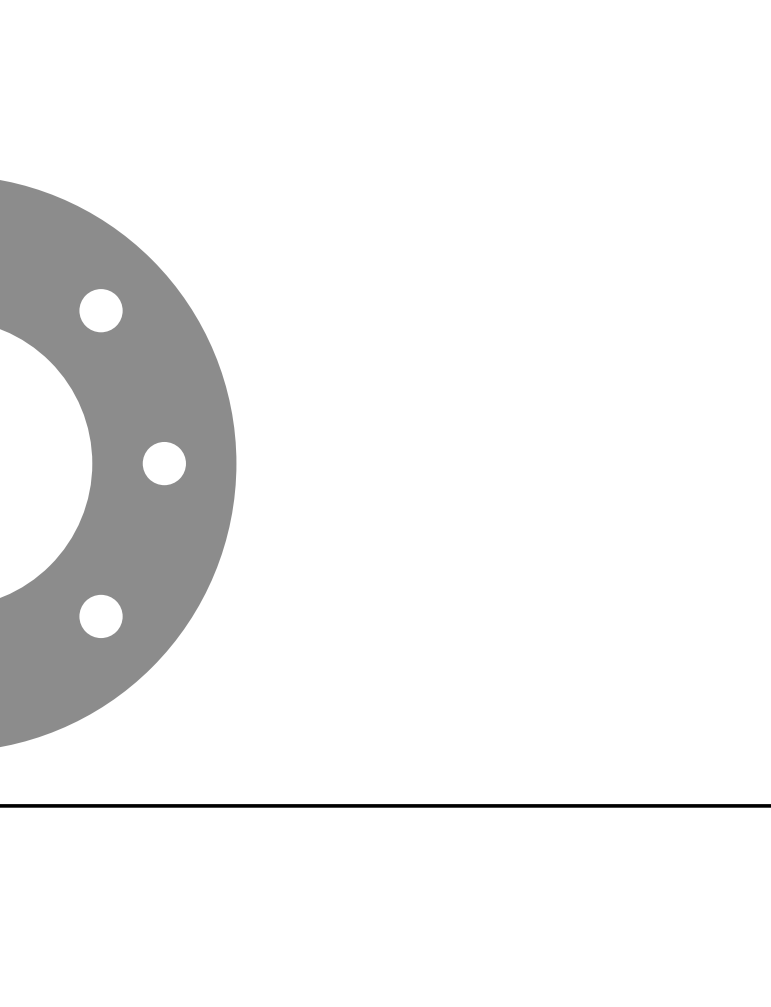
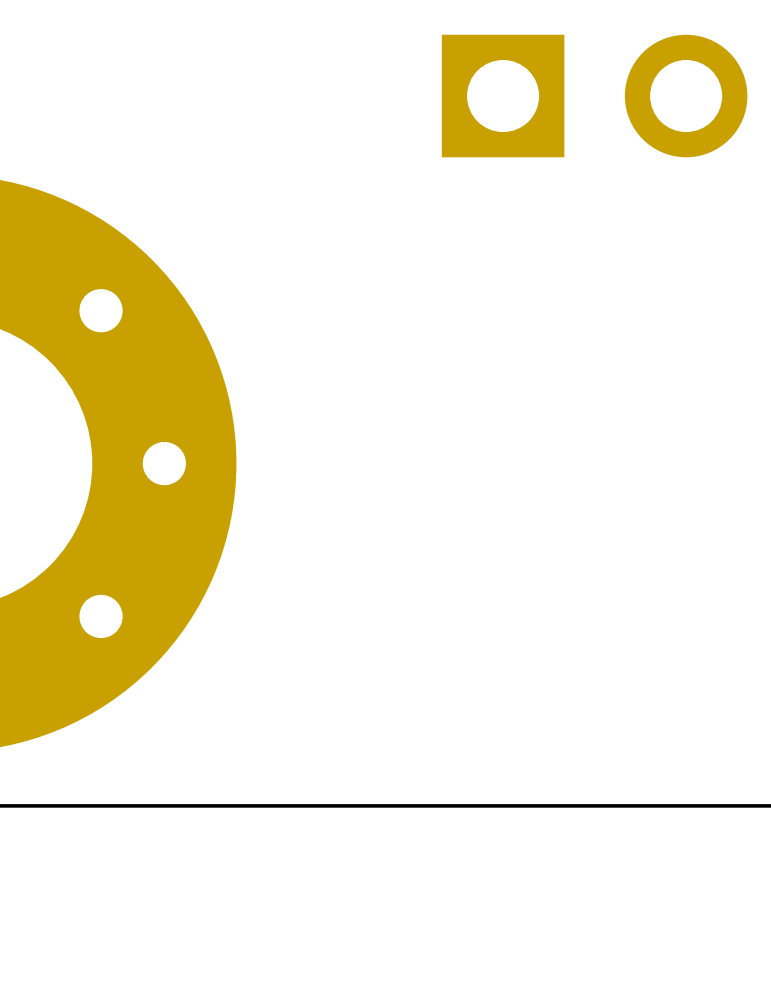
part: none -> (594, 96)

